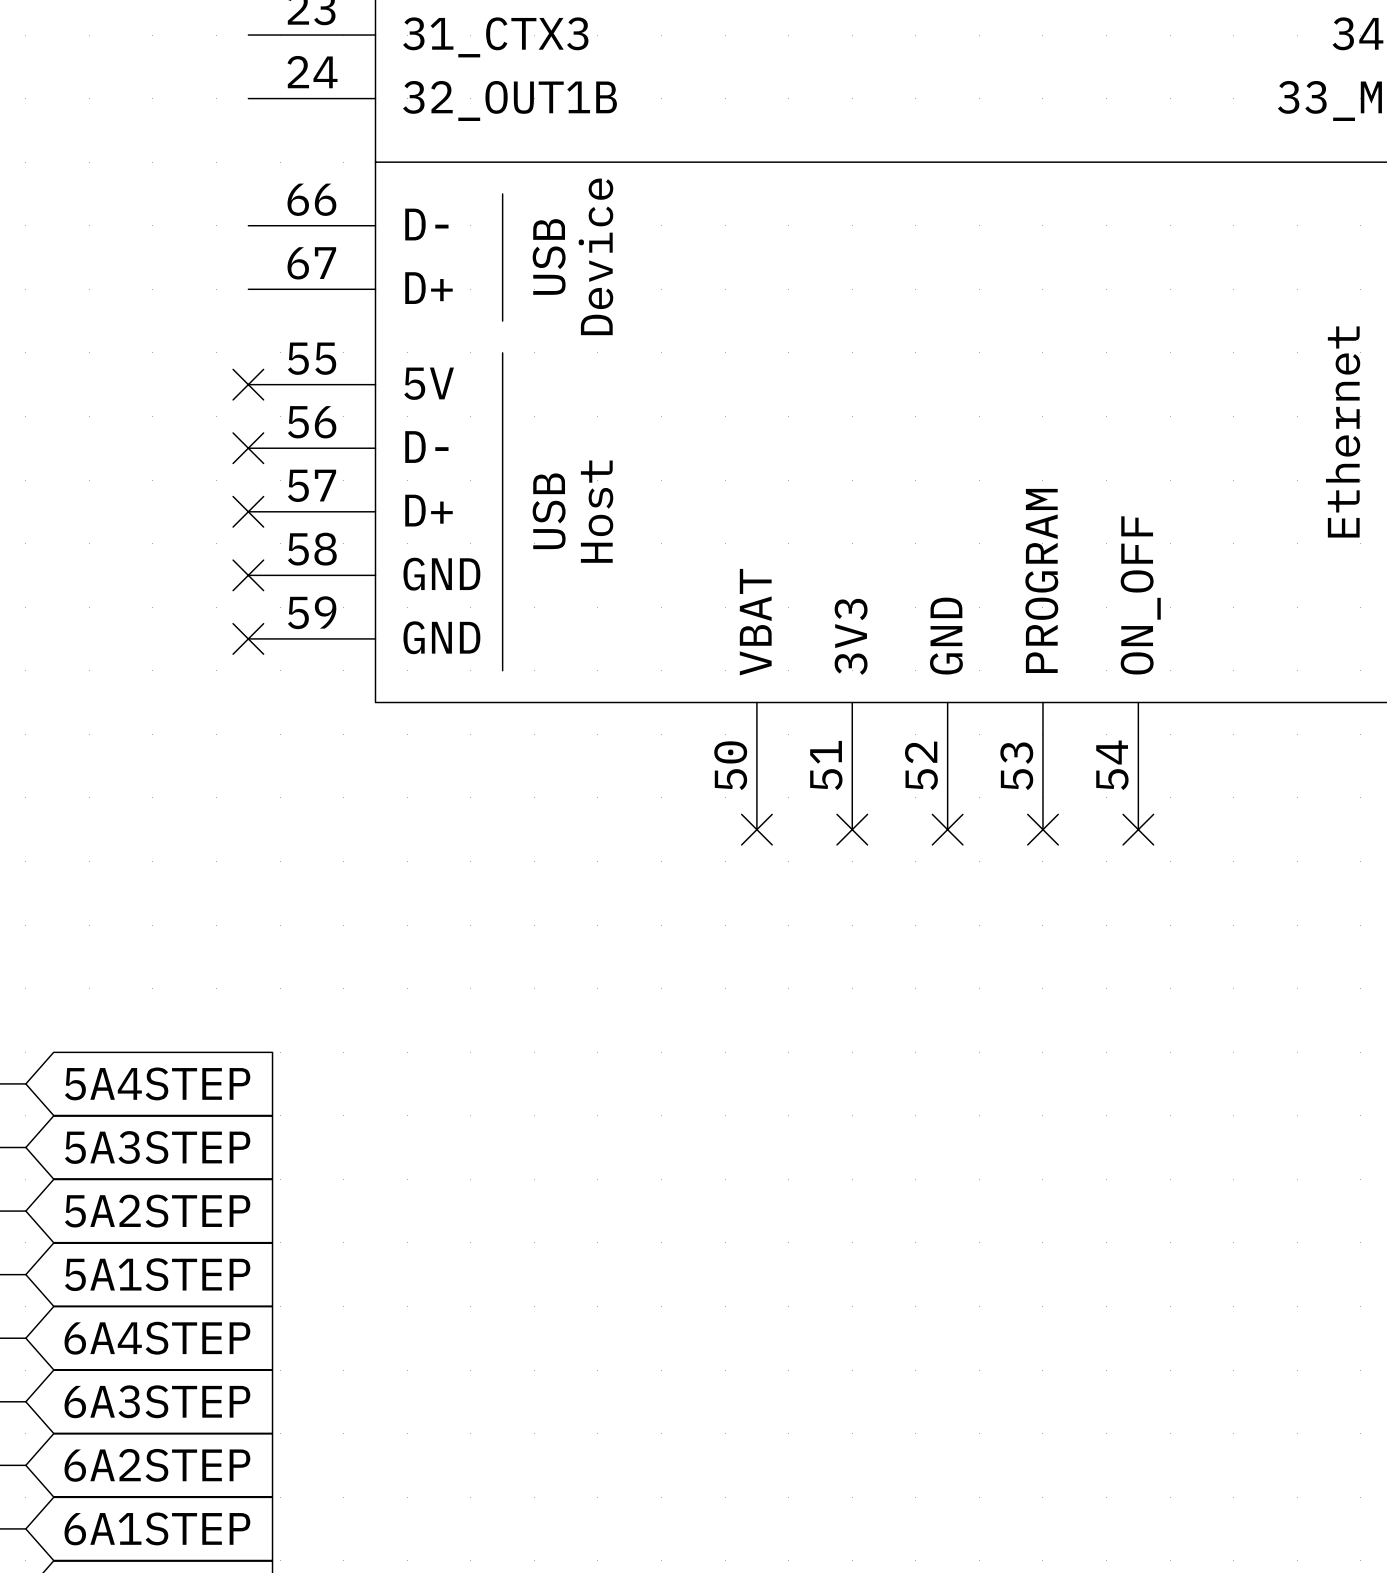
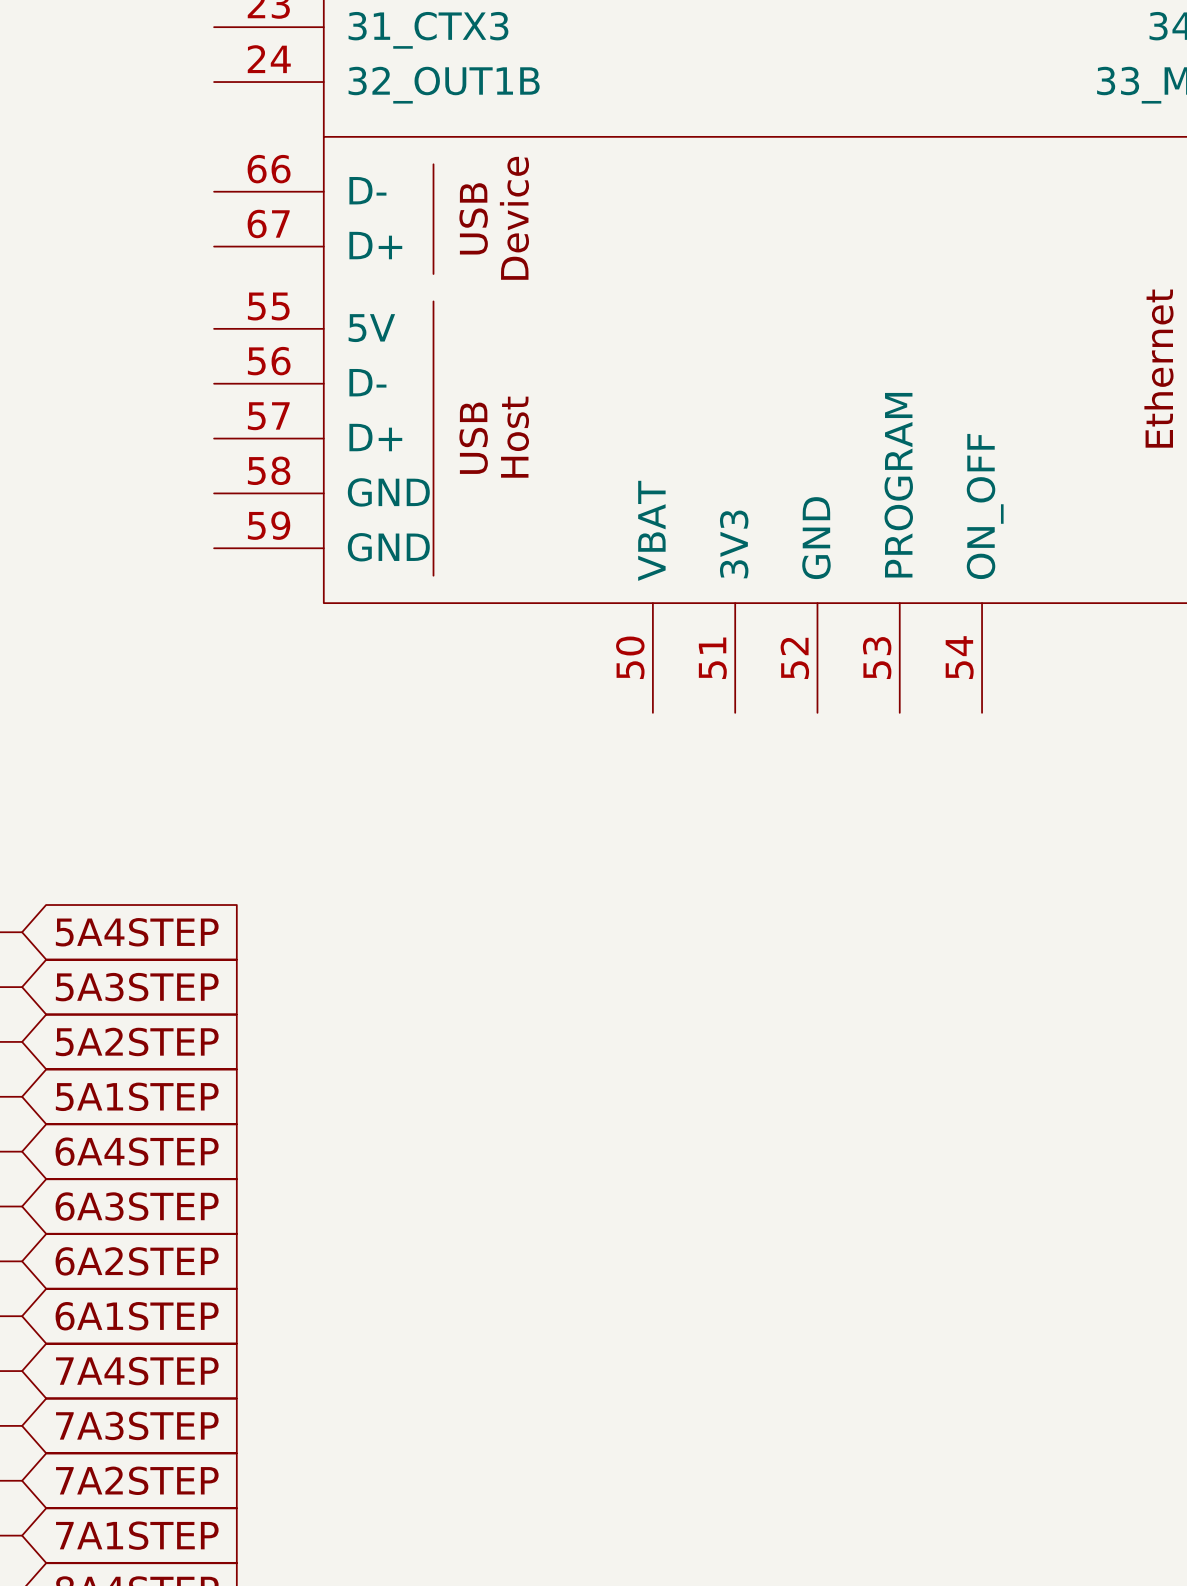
no-connect mark: (248, 384) -> none
no-connect mark: (248, 448) -> none
no-connect mark: (248, 511) -> none
no-connect mark: (248, 575) -> none
no-connect mark: (248, 638) -> none
no-connect mark: (756, 829) -> none
no-connect mark: (852, 829) -> none
no-connect mark: (947, 829) -> none
no-connect mark: (1042, 829) -> none
no-connect mark: (1138, 829) -> none

